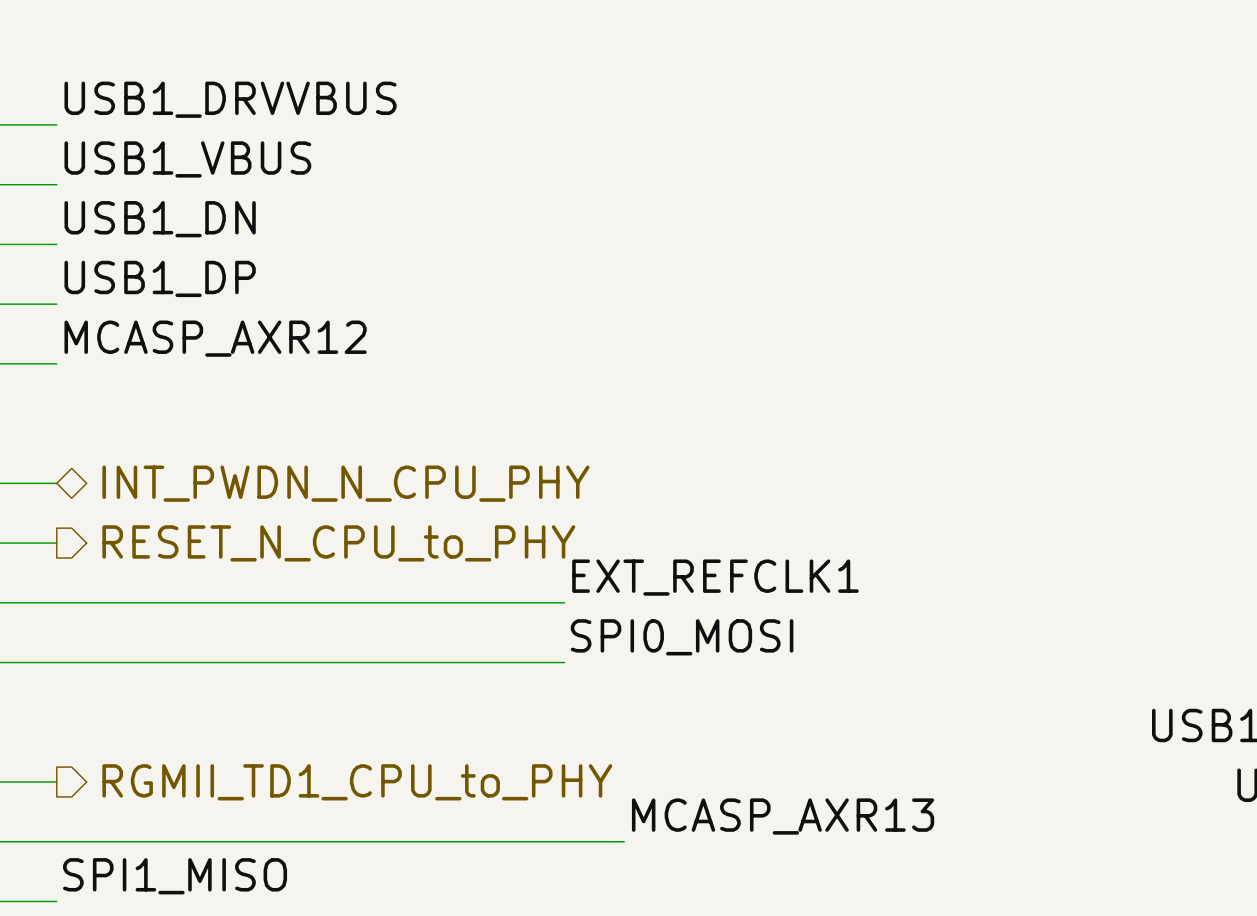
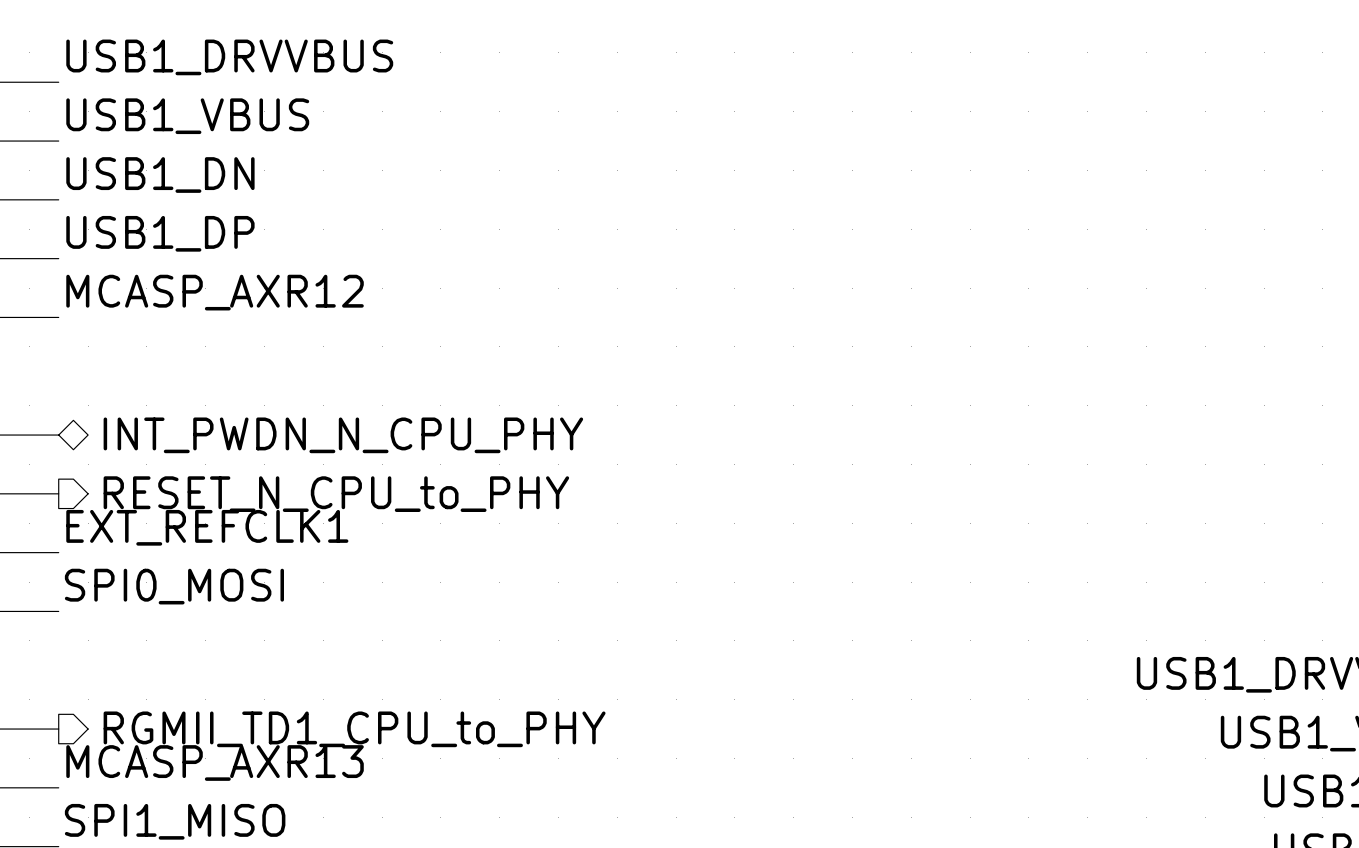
label position: EXT_REFCLK1 (715, 577) -> EXT_REFCLK1 (207, 527)
wire: (56, 602) (564, 602) -> none
label position: SPI0_MOSI (682, 637) -> SPI0_MOSI (174, 586)
wire: (56, 662) (564, 662) -> none
label position: MCASP_AXR13 (783, 816) -> MCASP_AXR13 (215, 762)
wire: (56, 841) (624, 841) -> none

